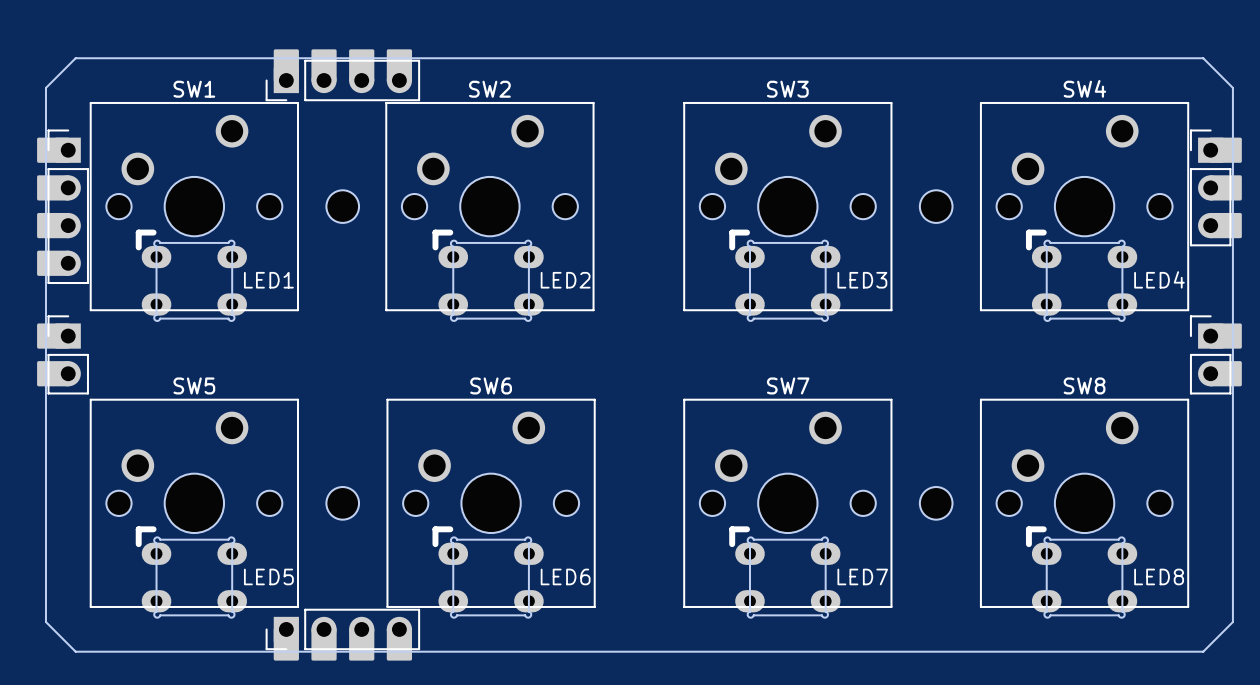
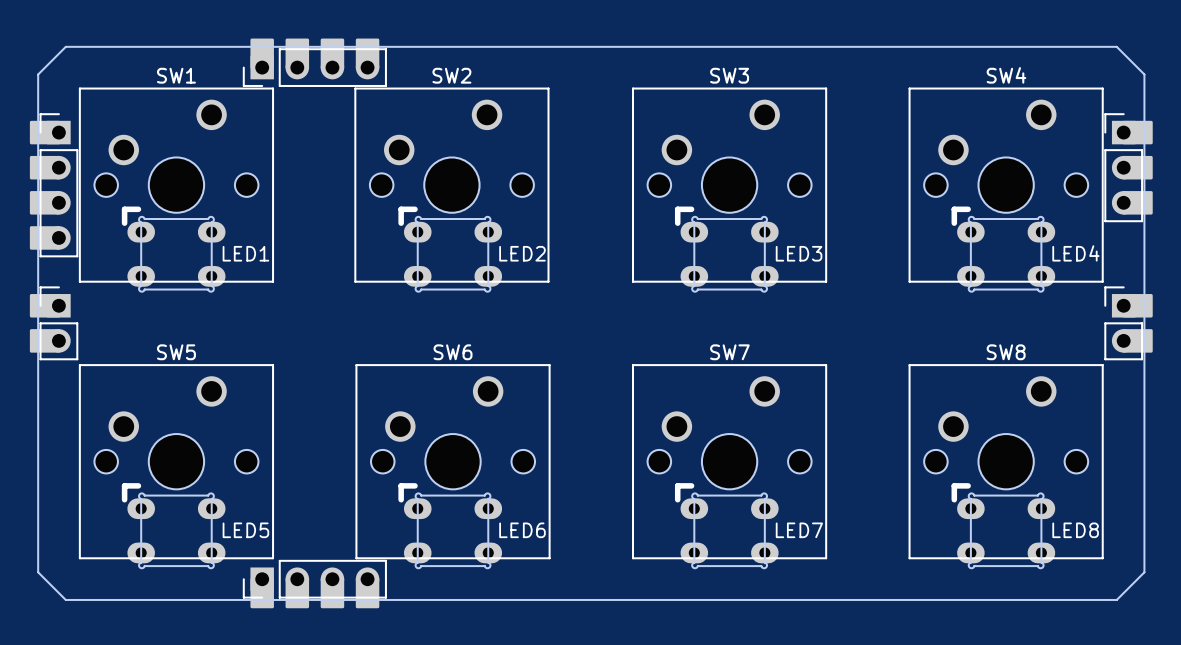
part: (342, 206) -> none
part: (936, 206) -> none
part: (342, 503) -> none
part: (936, 503) -> none

